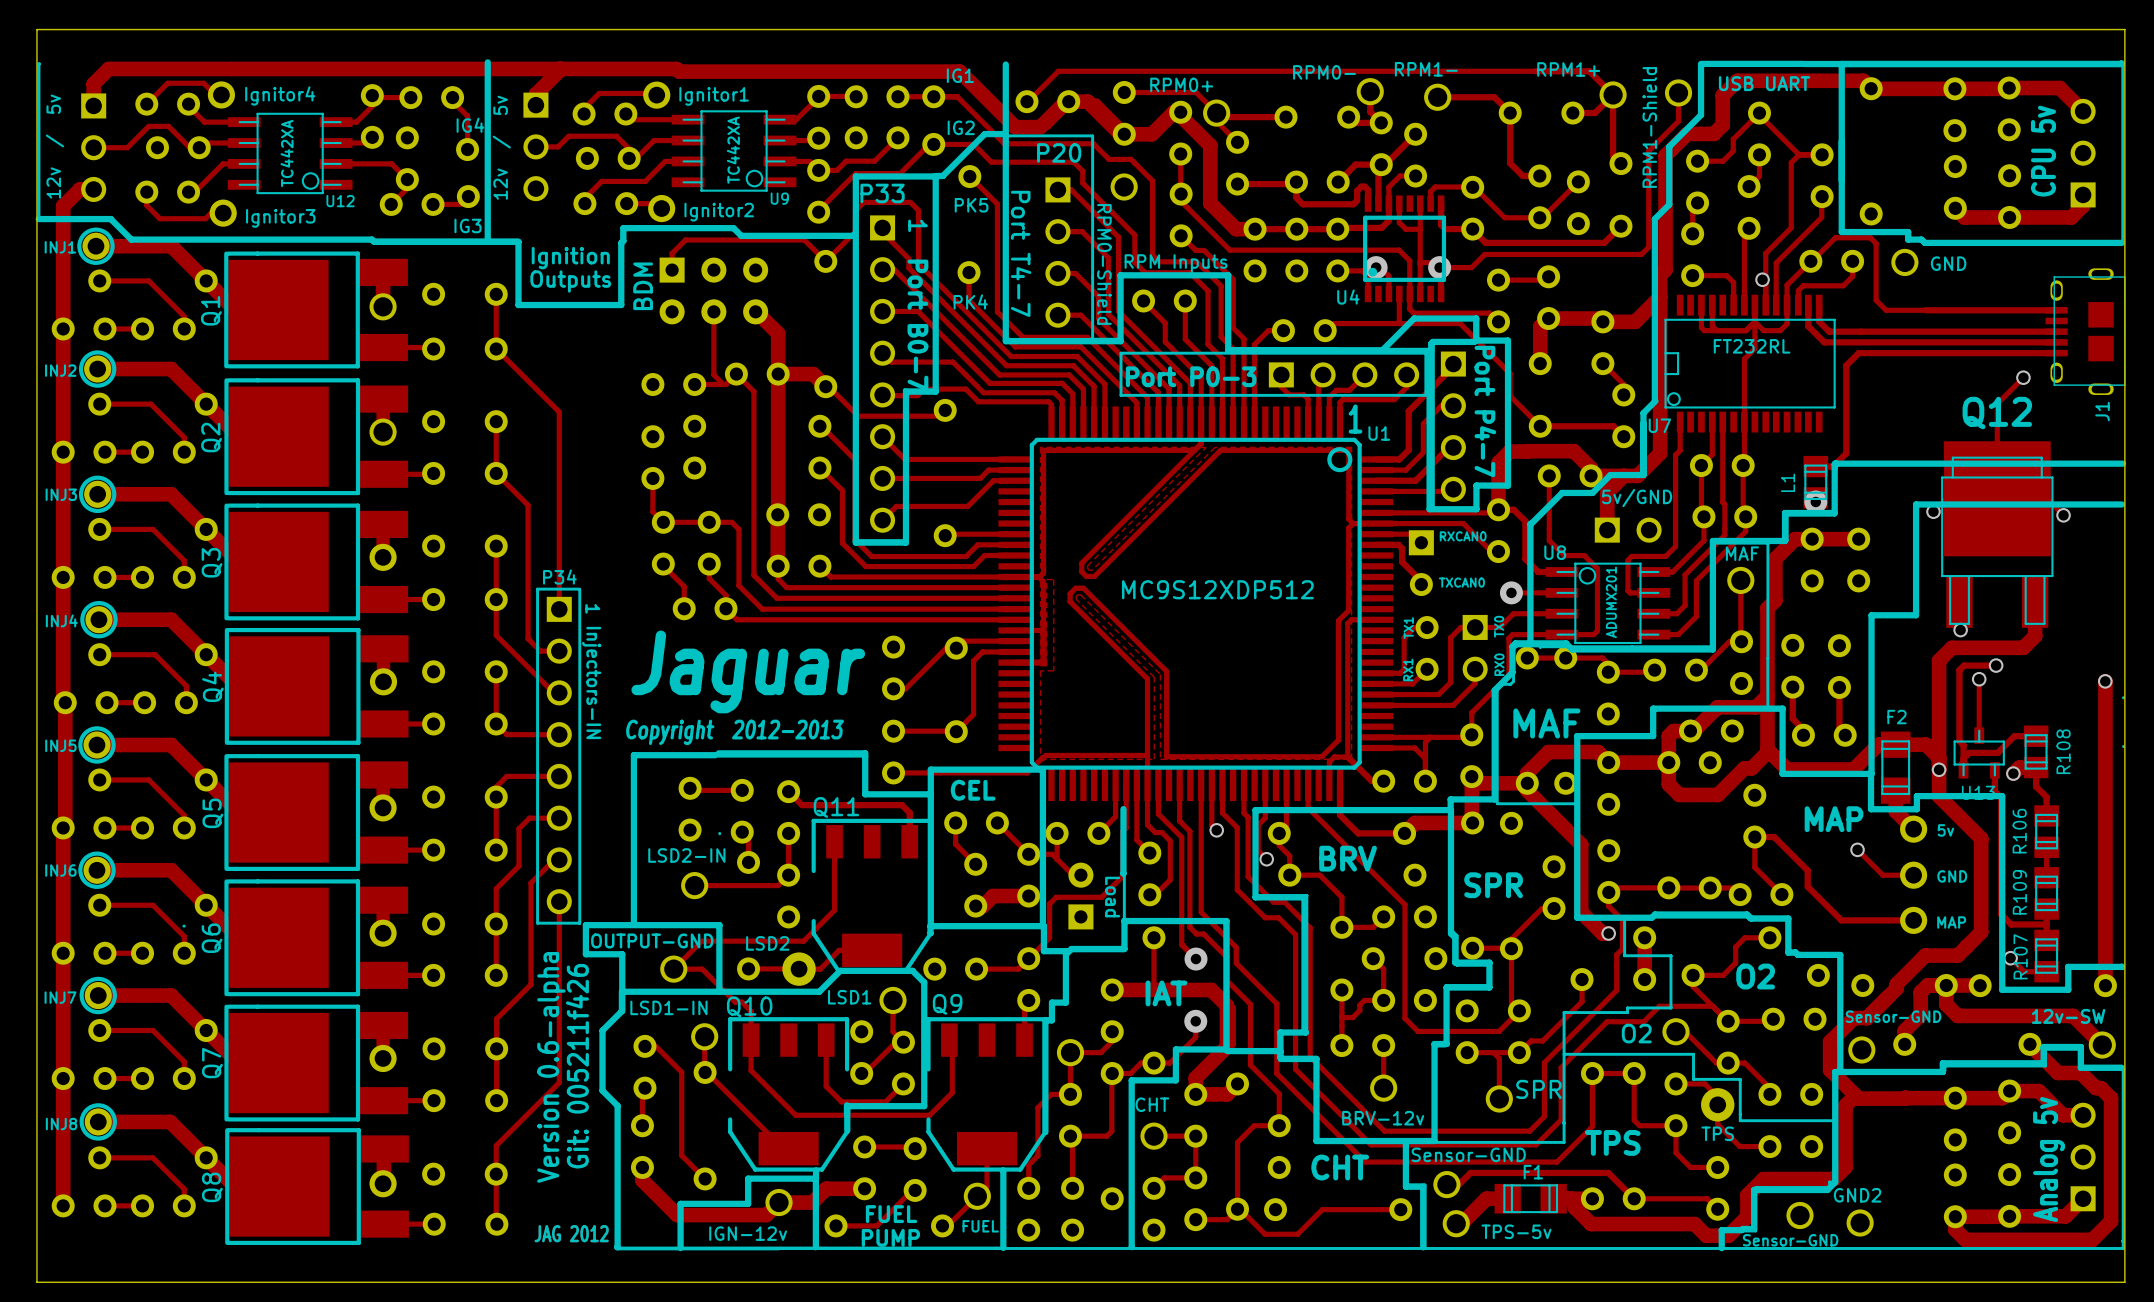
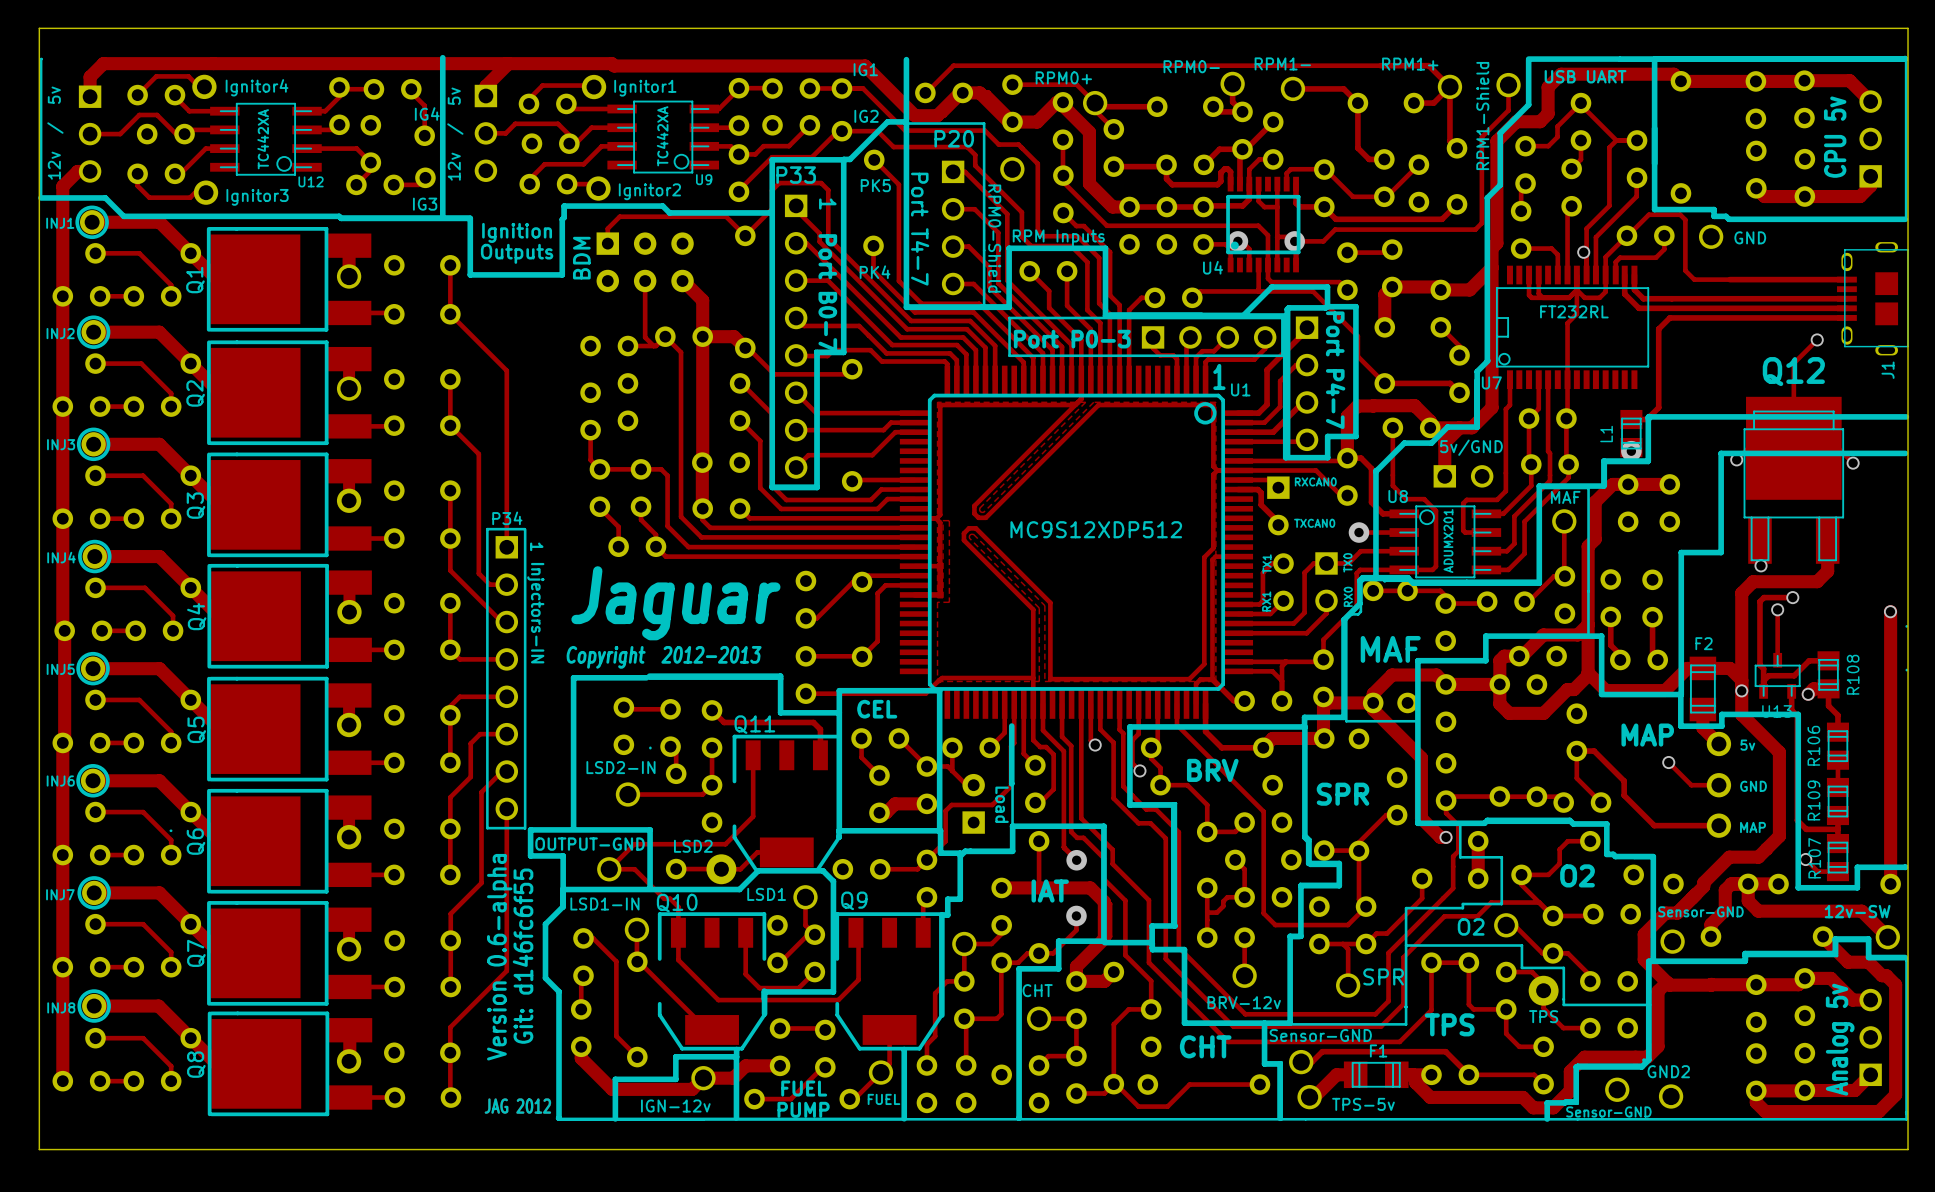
text: Git: 005211f426 (577, 1066) -> Git: d146fc6f55 (523, 956)

